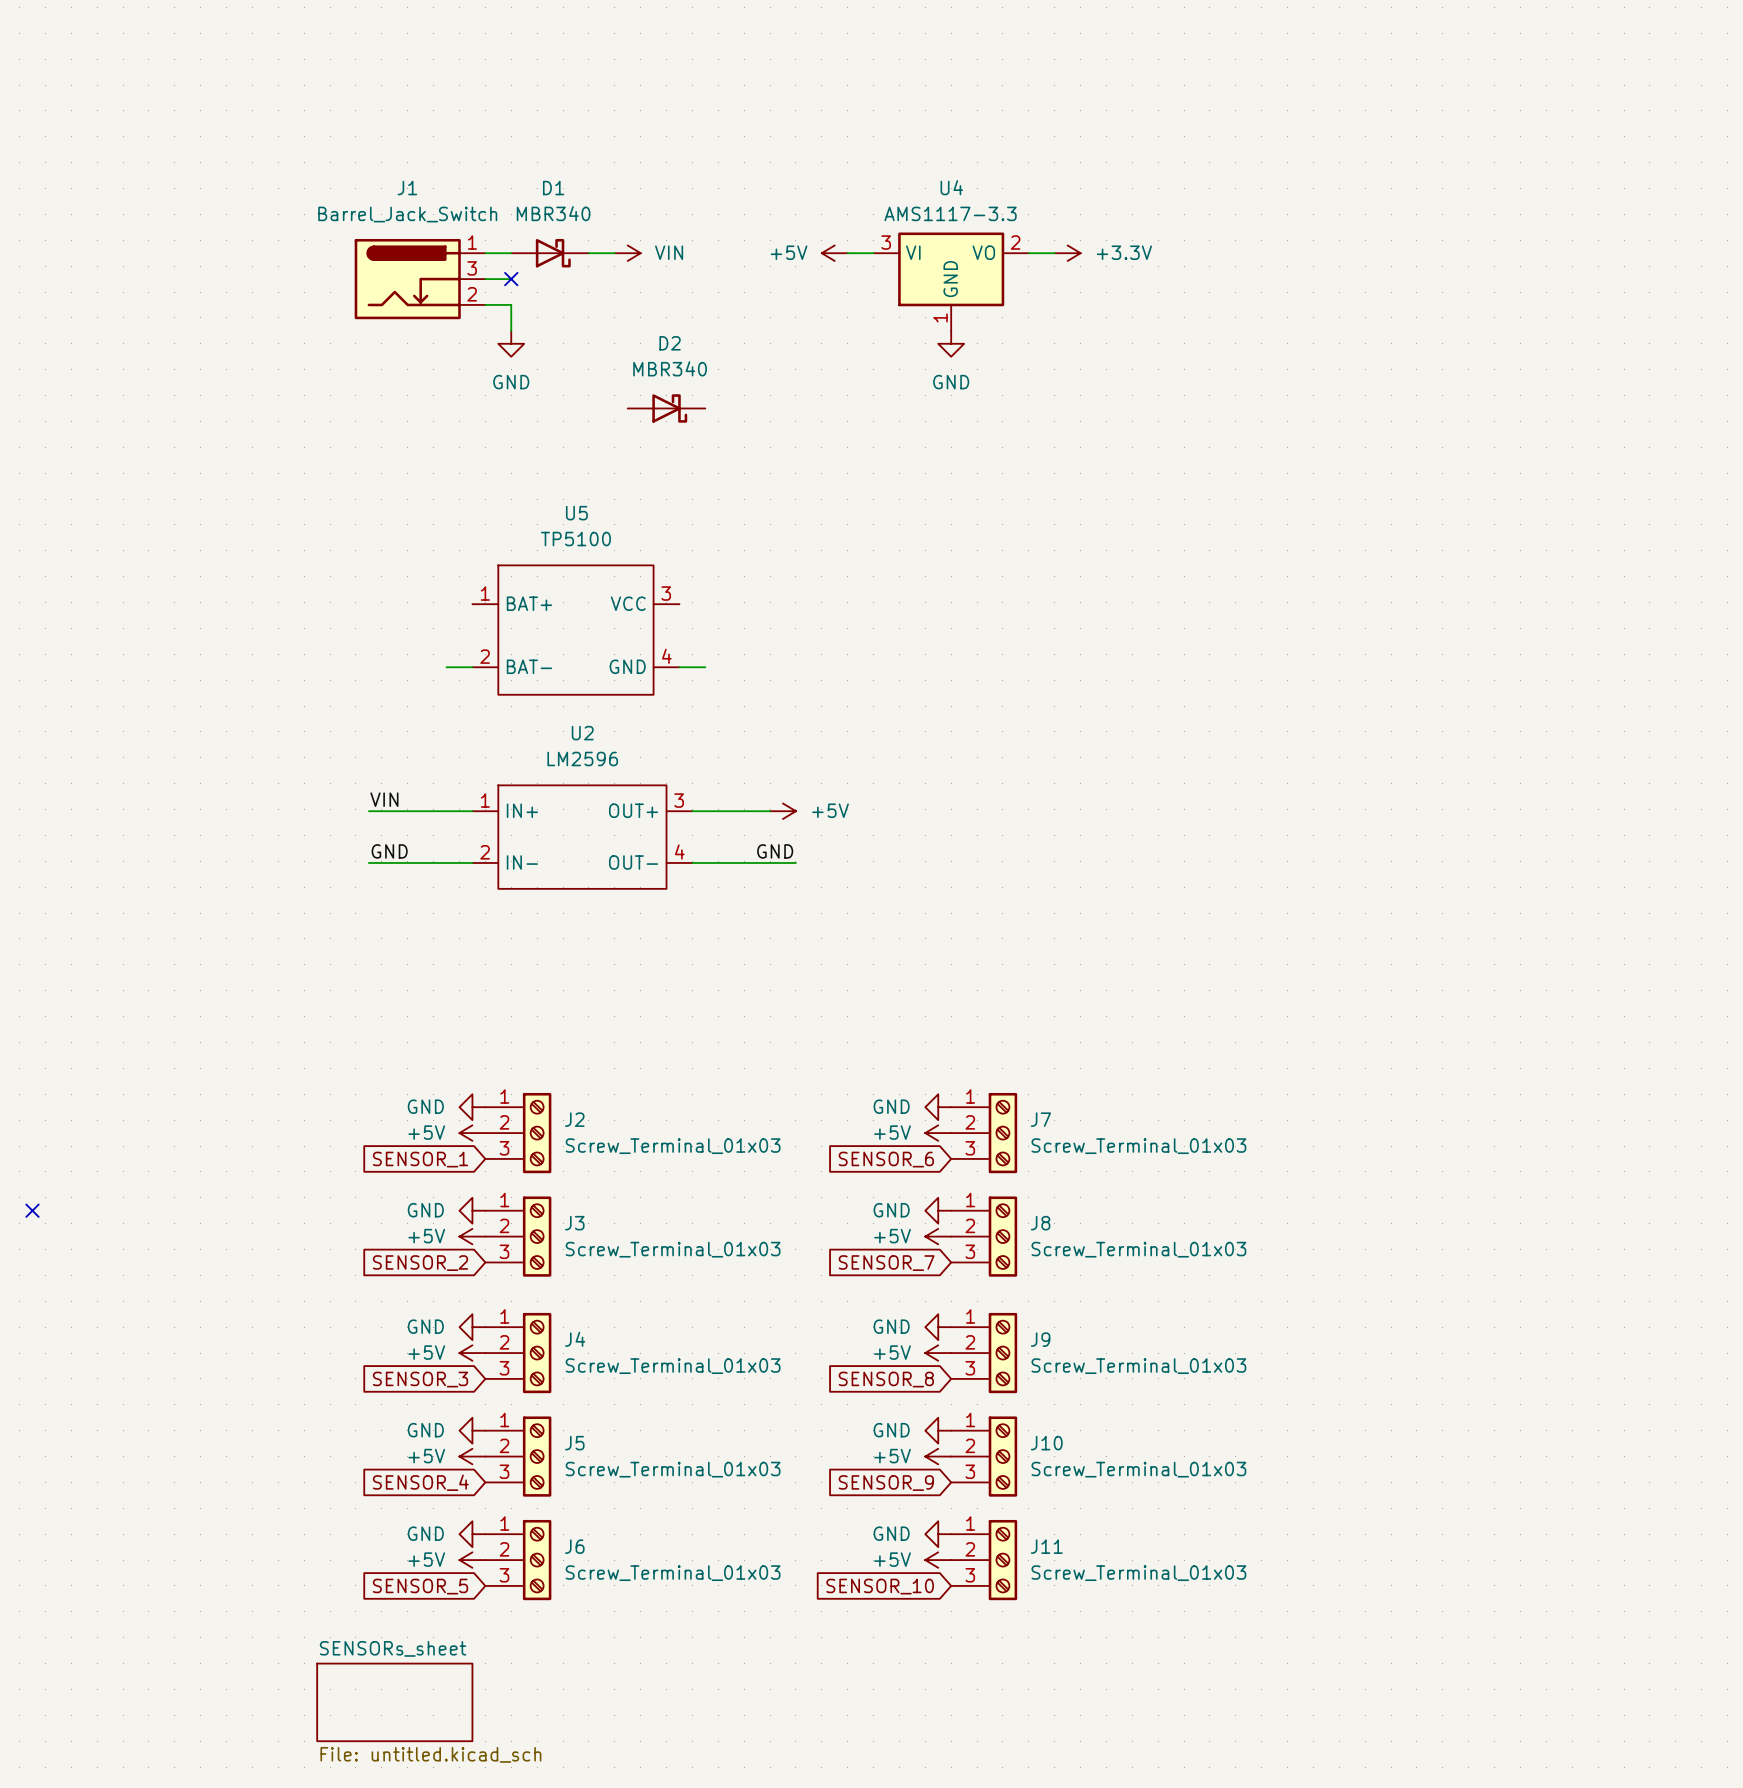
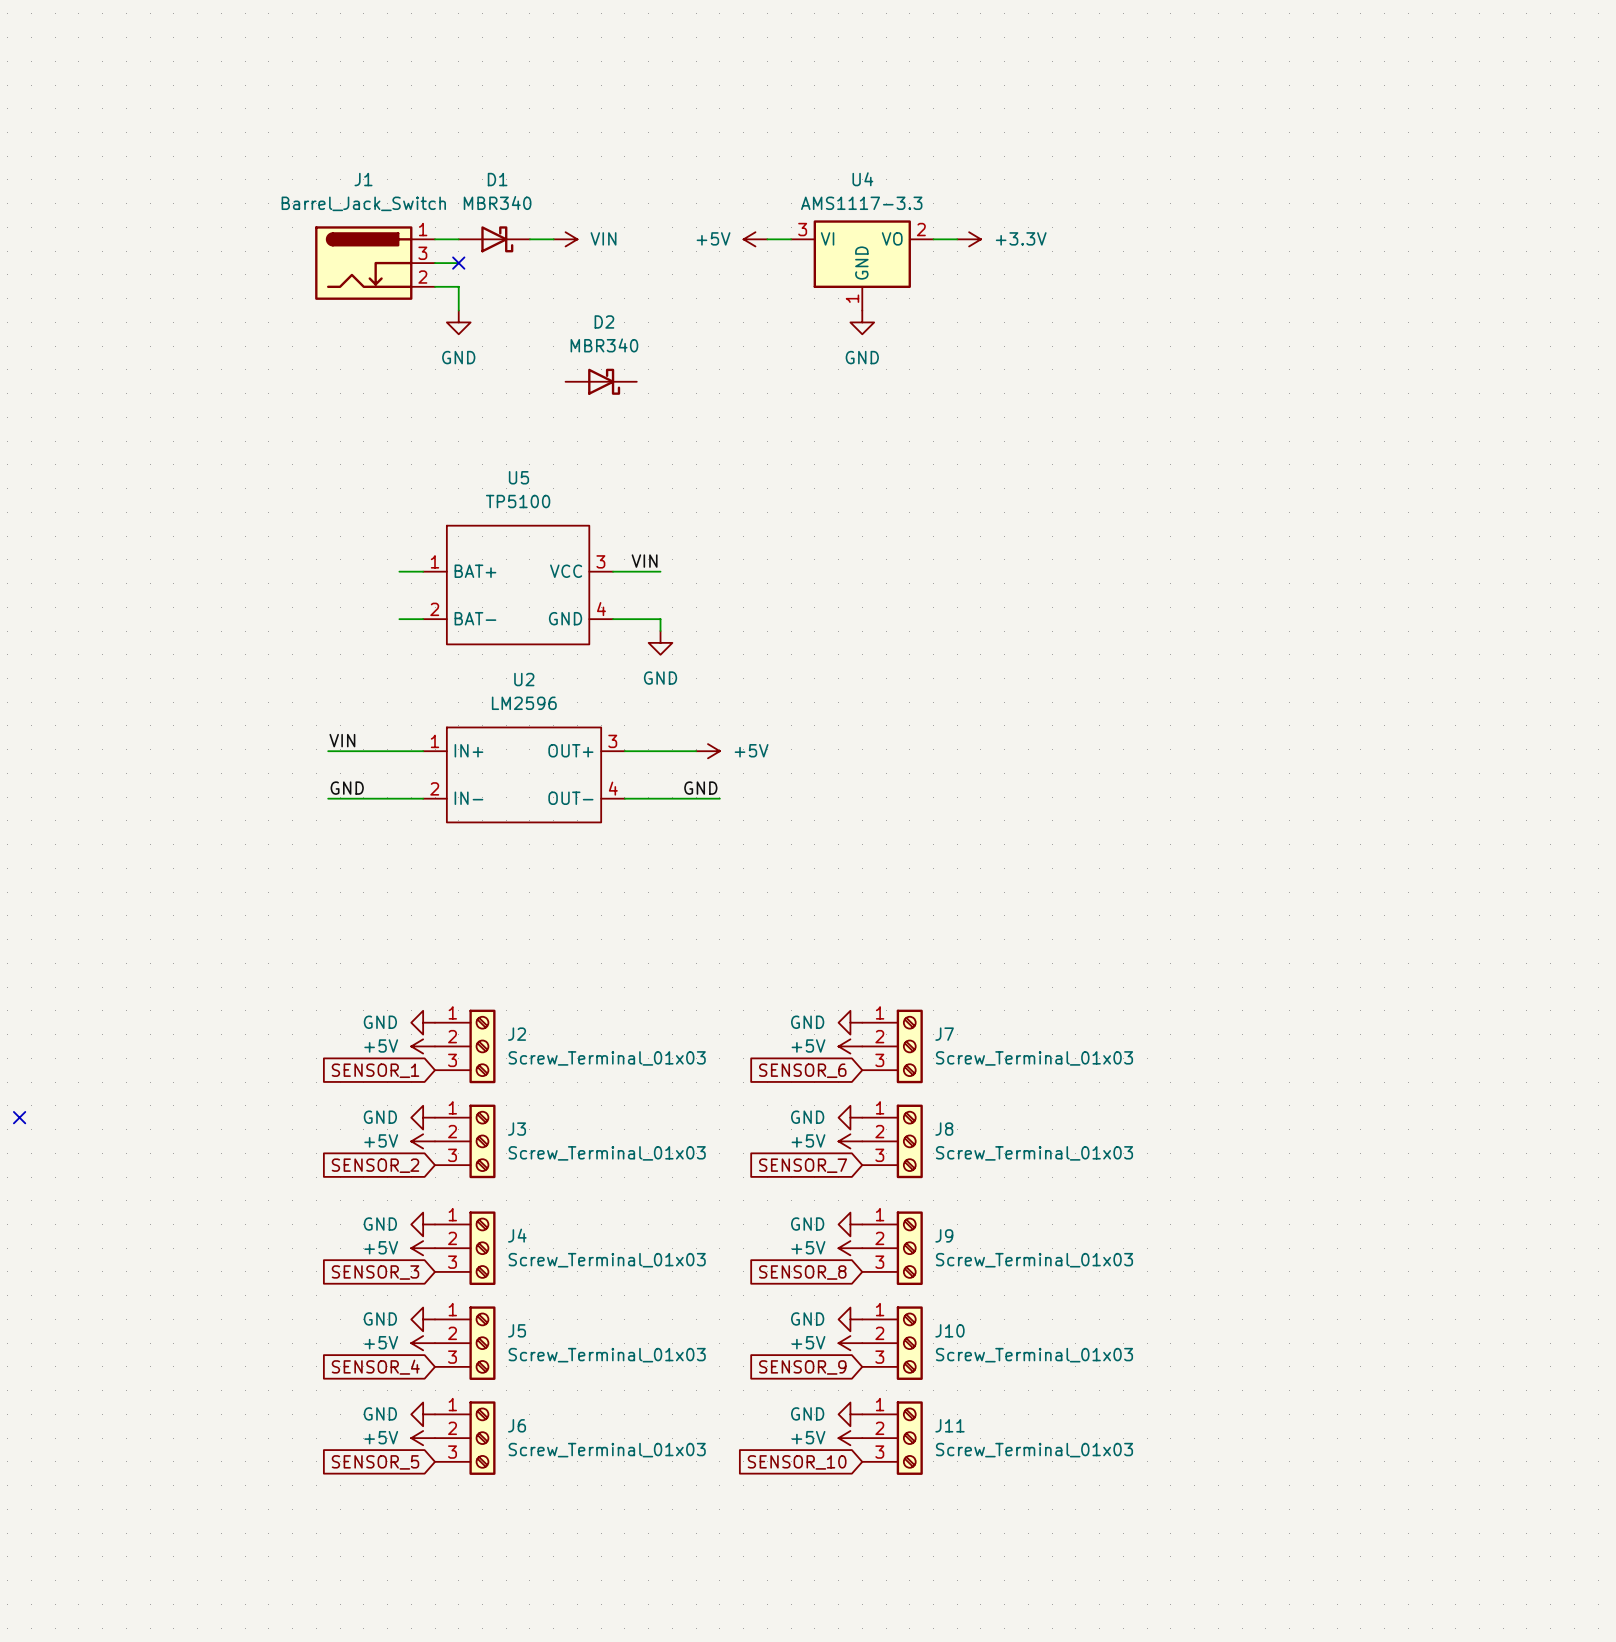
U5 symbol: [472, 565, 680, 695] -> [423, 525, 614, 645]
label: none -> VIN (644, 561)
wire: none -> (399, 571) (423, 571)
wire: none -> (613, 571) (660, 571)
wire: none -> (636, 619) (660, 619) (660, 631)
power symbol: none -> GND (660, 642)
sheet SENSORs_sheet: File: untitled.kicad_sch (394, 1702) -> none

